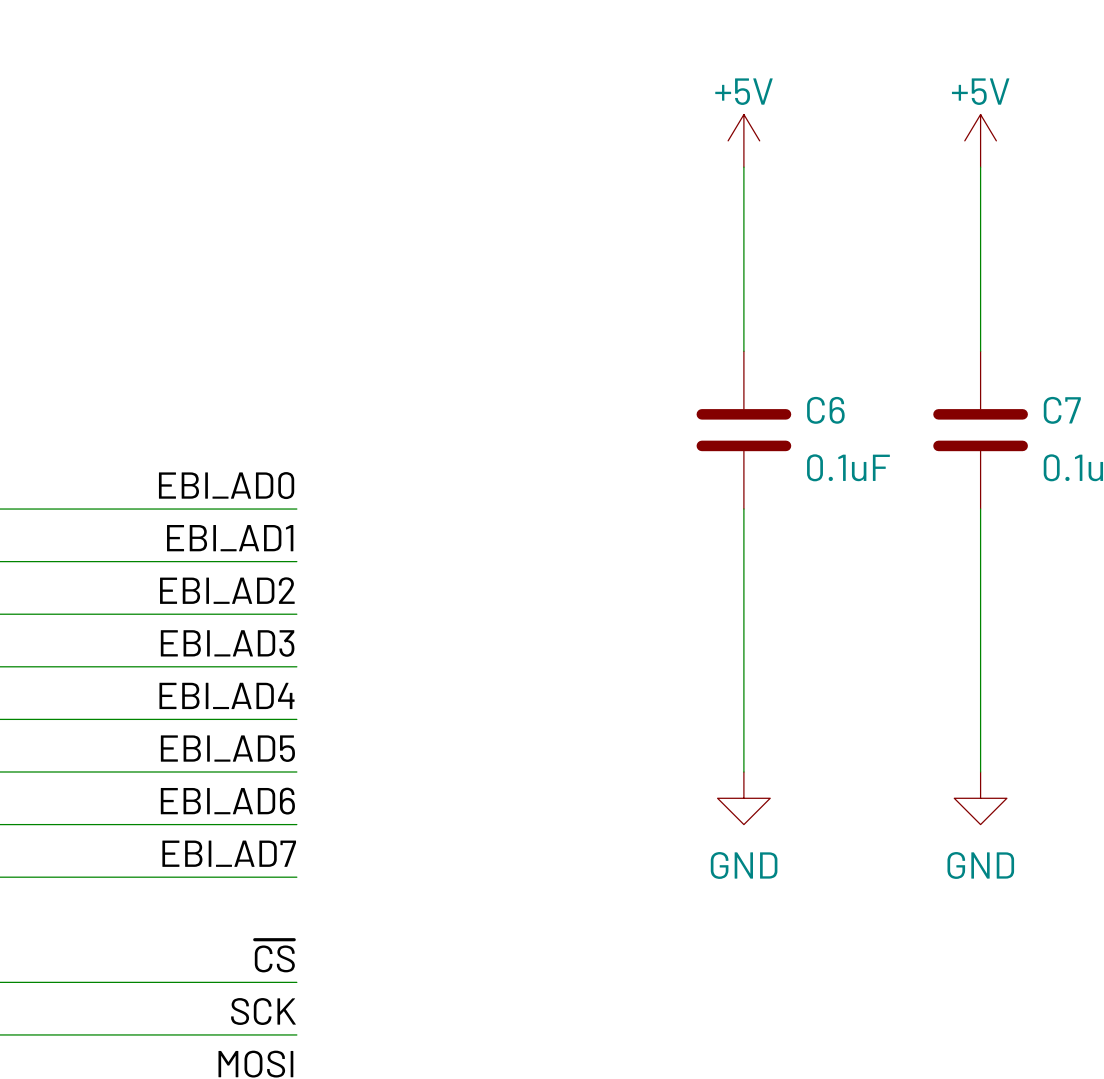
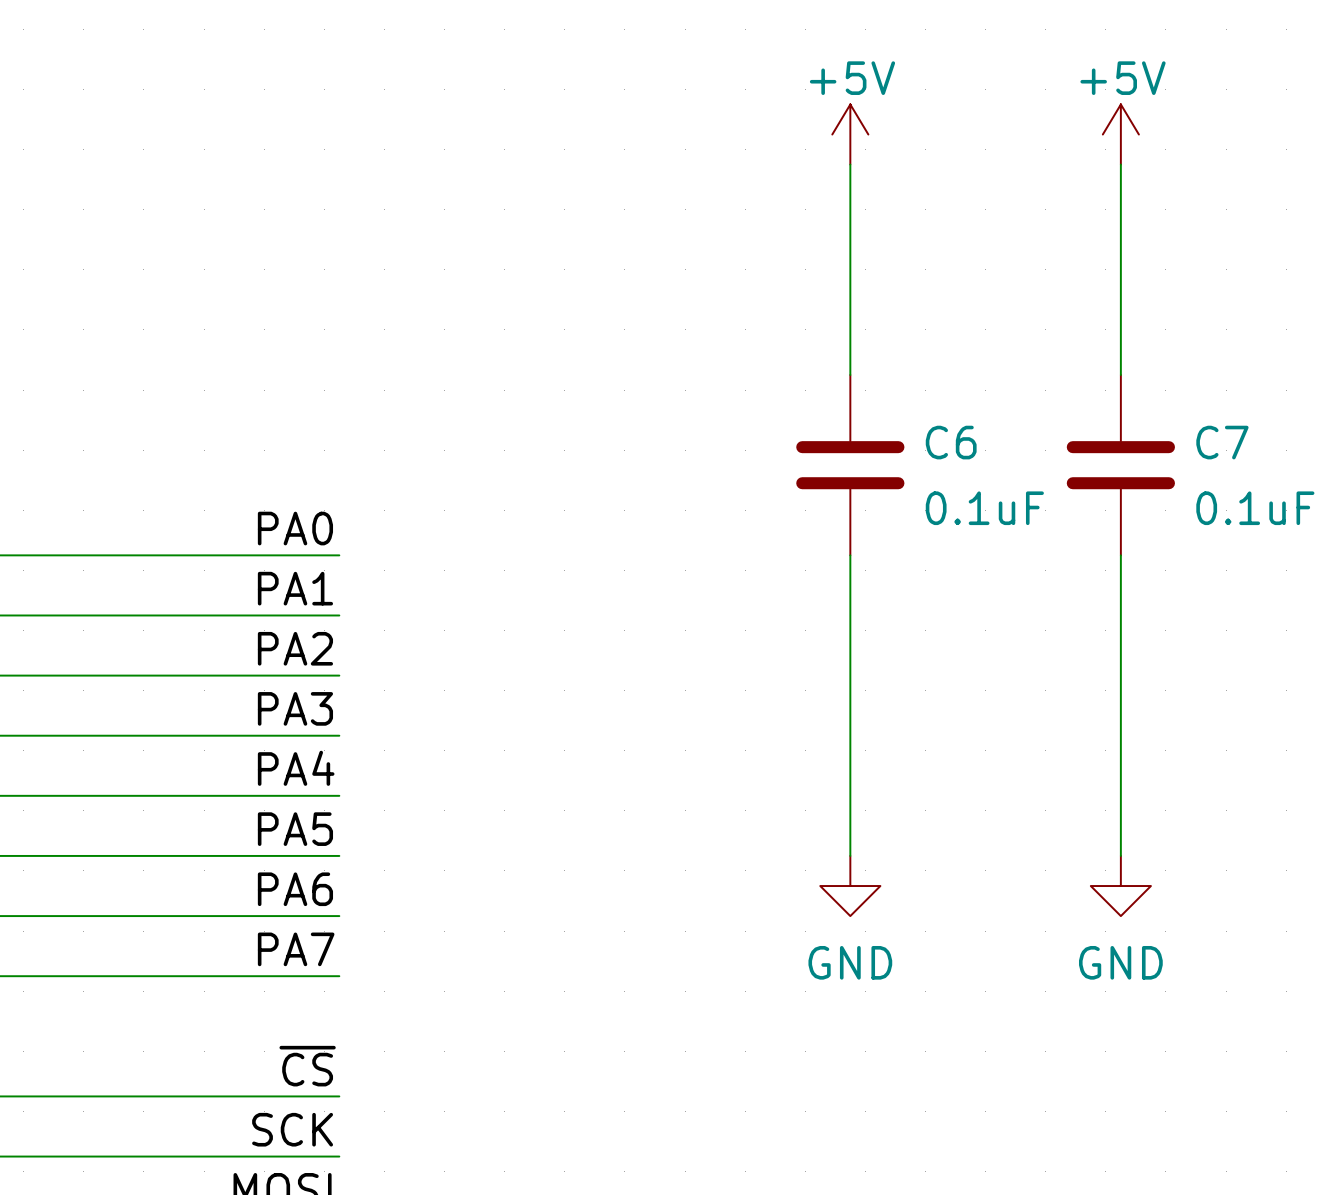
label: EBI_AD0 (226, 485) -> PA0 (295, 528)
label: EBI_AD1 (230, 538) -> PA1 (295, 588)
label: EBI_AD2 (227, 590) -> PA2 (295, 648)
label: EBI_AD3 (227, 643) -> PA3 (295, 708)
label: EBI_AD4 (227, 695) -> PA4 (296, 768)
label: EBI_AD5 (227, 748) -> PA5 (295, 829)
label: EBI_AD6 (227, 801) -> PA6 (295, 889)
label: EBI_AD7 (229, 853) -> PA7 (296, 949)

